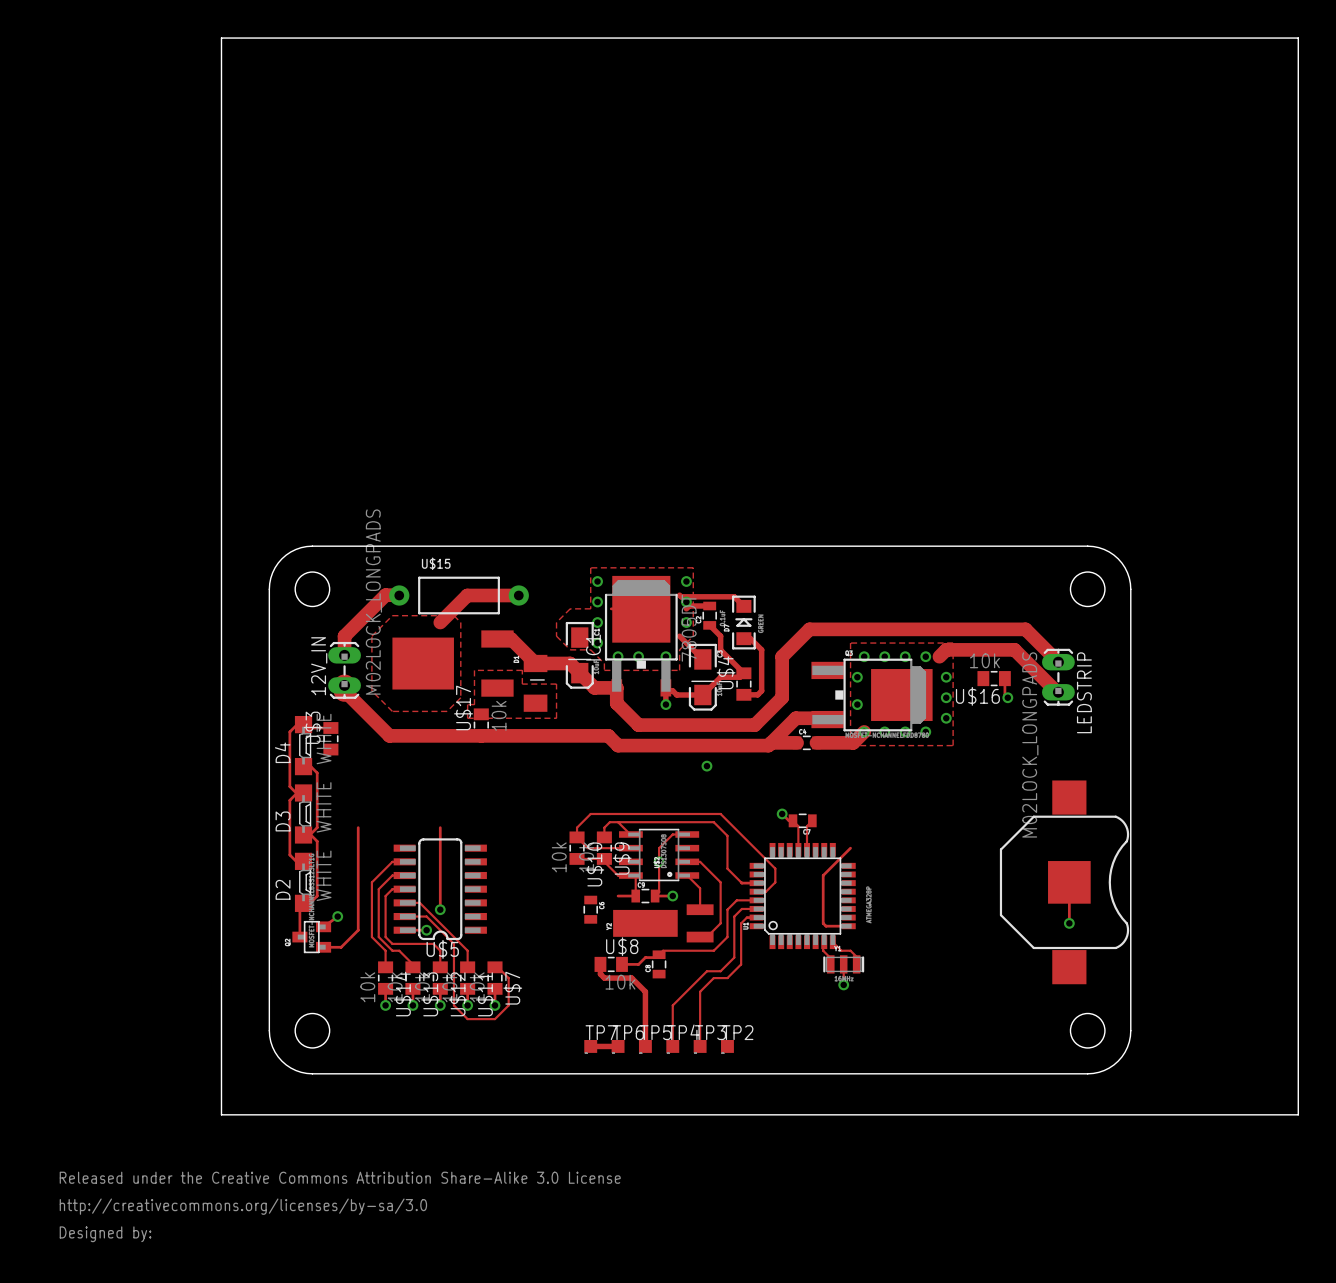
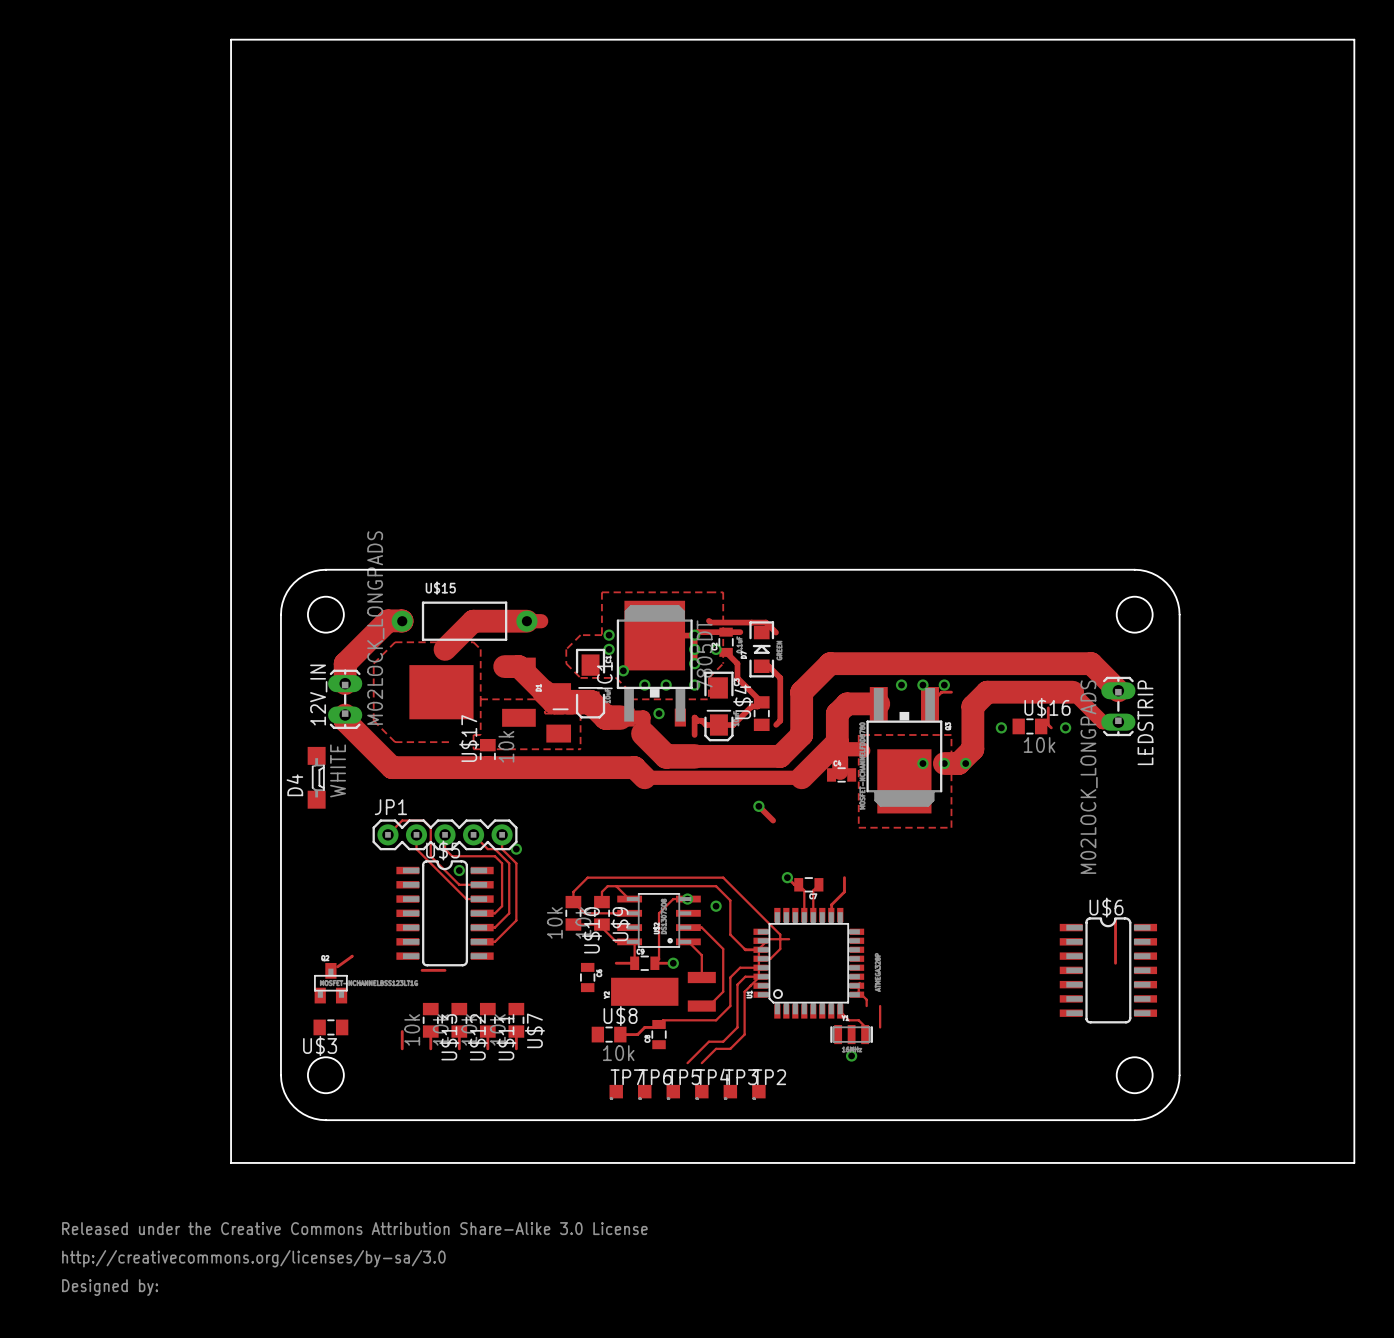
zone outline: (590, 567) (590, 608) (577, 608) -> (616, 592) (601, 592) (601, 635)
via: (597, 581) -> none
via: (686, 581) -> none
track: (399, 595) (385, 595) (344, 636) (344, 655) -> (402, 621) (387, 620) (345, 663) (345, 683)
U$15 position: (459, 595) -> (464, 621)
track: (467, 595) (440, 622) -> (487, 621) (473, 621) (445, 649)
track width: thin (467, 595) (505, 595) -> thick (487, 621) (526, 621)
via: (597, 602) -> none
via: (686, 602) -> none
track: (689, 605) (686, 608) -> (719, 632) (697, 632) (694, 635)
zone outline: (570, 608) (556, 622) (556, 636) (570, 649) -> (594, 635) (580, 635) (566, 649) (566, 663) (580, 677) (594, 677)
via: none -> (609, 635)
via: none -> (694, 635)
zone outline: (392, 615) (371, 636) (371, 690) (392, 711) -> (409, 642) (395, 642) (373, 663) (373, 720) (395, 742) (409, 742)
part position: (709, 615) -> (726, 642)
via: none -> (609, 649)
via: (597, 622) -> none
via: none -> (694, 649)
part position: (743, 622) -> (761, 649)
track: (709, 625) (720, 636) (720, 650) (743, 673) (739, 677) (726, 677) -> (726, 652) (737, 663) (737, 678) (761, 702) (757, 706)
IC1 position: (641, 636) -> (654, 663)
via: none -> (694, 663)
track: (679, 636) (702, 659) -> none
track: (743, 638) (750, 638) (761, 649) (761, 690) (757, 694) (743, 694) -> (761, 666) (768, 666) (780, 677) (780, 720) (776, 724)
track: (497, 639) (511, 639) (535, 663) (570, 663) (594, 687) -> (504, 666) (518, 666) (554, 702) (590, 702) (605, 717) (620, 717)
zone outline: (850, 643) (953, 643) (953, 745) (850, 745) (850, 643) -> none
part position: (579, 655) -> (590, 683)
via: (925, 656) -> none
track: (939, 656) (946, 649) (1014, 649) (1028, 663) -> (944, 763) (958, 763) (972, 749) (972, 706) (987, 692) (1072, 692)
U$16 value position: 10k (984, 660) -> 10k (1039, 744)
track: (1058, 662) (1025, 629) (809, 629) (782, 656) (782, 697) (754, 725) (747, 725) -> (1118, 690) (1091, 663) (830, 663) (801, 692) (801, 734) (780, 756)
track: none -> (951, 692) (941, 692) (930, 703)
12V_IN position: (344, 670) -> (345, 699)
zone outline: none -> (480, 699) (494, 699)
zone outline: (474, 670) (474, 704) (467, 704) (467, 718) -> (480, 727) (480, 734) (473, 734) (473, 749) (487, 749)
track: none -> (878, 703) (847, 703) (837, 713) (837, 742) (830, 749) (840, 759) (840, 771)
part position: (702, 677) -> (718, 706)
via: (857, 677) -> none
via: (946, 677) -> none
LEDSTRIP position: (1058, 677) -> (1118, 706)
U$16 position: (994, 678) -> (1029, 726)
via: none -> (659, 713)
U$4 position: (743, 684) -> (761, 713)
track: (344, 685) (344, 690) (389, 735) -> (345, 715) (345, 720) (392, 767) (406, 767)
part rotation: 0° (872, 695) -> 90° clockwise (904, 750)
U$16 name position: U$16 (977, 696) -> U$16 (1047, 707)
zone outline: (460, 697) (447, 711) (433, 711) -> none
via: (946, 697) -> none
via: none -> (1001, 727)
via position: (1007, 697) -> (1065, 727)
track width: thin (616, 703) (638, 725) (747, 725) -> thick (643, 733) (666, 756) (780, 756)
via: (665, 704) -> none
zone outline: none -> (858, 734) (858, 827) (951, 827) (951, 734) (858, 734)
via: (857, 704) -> none
track width: thin (795, 718) (768, 745) -> thick (830, 749) (801, 777)
via: (946, 718) -> none
U$17 position: (481, 725) -> (487, 756)
U$3 name position: U$3 (313, 727) -> U$3 (320, 1045)
track: (330, 728) (306, 728) (303, 724) (297, 724) (289, 731) (289, 786) (303, 800) (303, 792) -> none
track: (864, 731) (853, 742) (816, 742) -> none
via: (864, 731) -> none
track width: thin (389, 735) (608, 735) (618, 745) -> thick (406, 767) (634, 767) (644, 777)
U$3 rotation: 0° (330, 738) -> 90° clockwise (330, 1027)
U$3 position: (330, 738) -> (330, 1027)
track: (771, 742) (797, 742) -> none
track: (303, 766) (310, 766) (317, 772) (317, 827) (303, 841) (303, 834) -> none
via position: (706, 766) -> (758, 806)
track: none -> (758, 806) (773, 820)
track: (296, 793) (289, 800) (289, 855) (296, 861) (303, 861) -> none
track: none -> (387, 834) (402, 820) (423, 820) (430, 827) (430, 856) (459, 884) (487, 884)
track: none -> (416, 834) (416, 849) (466, 899) (482, 899)
track: none -> (445, 834) (445, 849) (452, 856) (494, 856) (502, 863) (502, 906) (494, 913) (482, 913)
JP1: none -> (445, 834)
track: none -> (473, 834) (487, 849) (494, 849) (509, 863) (509, 913) (494, 927) (482, 927)
track: none -> (502, 834) (502, 849) (516, 863) (516, 920) (494, 941) (482, 941)
D3: WHITE (303, 813) -> none
via: none -> (516, 849)
track: (782, 813) (798, 826) (798, 849) -> (787, 877) (804, 890) (804, 915)
via: (782, 813) -> none
part position: (802, 820) -> (808, 884)
track: (812, 820) (806, 826) (806, 849) -> (818, 884) (813, 890) (813, 915)
track: (618, 822) (630, 834) -> (616, 886) (629, 899)
track: (358, 827) (358, 930) (341, 947) (323, 947) -> none
track: (440, 827) (440, 909) -> none
track: (310, 834) (317, 841) (317, 896) (303, 909) (299, 909) -> none
via: none -> (459, 870)
track: (687, 834) (672, 834) (659, 848) (659, 892) (655, 896) -> (688, 899) (673, 899) (659, 913) (659, 959) (654, 963)
track: (604, 837) (604, 827) (609, 822) (713, 822) (727, 835) (727, 868) (741, 883) (756, 883) -> none
via: none -> (787, 877)
track: none -> (844, 877) (844, 891) (831, 904) (831, 915)
U$10 position: (577, 848) -> (573, 913)
U$9 position: (604, 848) -> (601, 913)
track: (630, 848) (587, 848) (577, 837) (577, 827) (590, 813) (720, 813) (775, 868) (775, 882) (765, 891) (756, 891) -> (629, 913) (584, 913) (573, 902) (573, 891) (587, 877) (723, 877) (780, 934) (780, 948) (770, 958) (760, 958)
track: (850, 848) (823, 875) (823, 923) (826, 926) (848, 926) -> none
part position: (659, 855) -> (659, 920)
track: (577, 858) (604, 858) (604, 861) (618, 875) (635, 875) (635, 896) (618, 896) -> (573, 924) (601, 924) (601, 927) (616, 941) (634, 941) (634, 963) (616, 963)
track: (404, 861) (392, 861) (371, 882) (371, 937) (385, 950) (385, 967) -> none
track: (687, 861) (700, 861) (720, 882) (720, 923) (706, 937) (700, 937) -> (688, 927) (701, 927) (723, 948) (723, 991) (708, 1006) (701, 1006)
via: none -> (716, 906)
track: (404, 875) (392, 875) (378, 889) (378, 937) (392, 950) (399, 950) (412, 964) (412, 967) -> none
track: (687, 875) (700, 888) -> (601, 902) (601, 891) (607, 886) (716, 886) (730, 900) (730, 926)
D2: WHITE (303, 882) -> none
part: (1064, 882) -> none
track: (404, 889) (392, 889) (385, 896) (385, 937) (392, 943) (433, 943) (440, 950) (440, 967) -> none
U$5 rotation: 0° (440, 889) -> 180° (445, 913)
part position: (645, 896) -> (644, 963)
track: (659, 896) (672, 896) -> (659, 963) (673, 963)
via: (672, 896) -> none
track: (700, 896) (700, 909) -> (730, 934) (745, 949) (760, 949)
part position: (802, 896) -> (808, 963)
track: (404, 902) (419, 902) (467, 950) (467, 967) -> none
track: none -> (688, 941) (701, 955) (701, 977)
track: (303, 903) (299, 906) (299, 937) -> none
track: (756, 908) (741, 908) (734, 916) (734, 957) (720, 971) (706, 971) (679, 998) -> none
via: (440, 909) -> none
part position: (590, 909) -> (587, 977)
via: (337, 916) -> none
track: (399, 916) (426, 916) (453, 943) (453, 1005) (467, 1019) (494, 1019) (508, 1005) (508, 978) (497, 967) (494, 967) (494, 964) -> none
track: (756, 917) (746, 917) (741, 923) (741, 964) (727, 978) (713, 978) (706, 984) -> (760, 976) (745, 976) (737, 984) (737, 1027)
via: none -> (673, 963)
part position: (663, 923) -> (663, 991)
via: (1069, 923) -> none
track: none -> (760, 967) (740, 967) (730, 977) (730, 1006) (716, 1020) (663, 1020) (656, 1027) (644, 1027) (637, 1034) (620, 1034)
via: (426, 930) -> none
U$6: none -> (1108, 970)
part rotation: 0° (311, 937) -> 90° clockwise (330, 983)
track: (832, 942) (841, 950) (850, 950) (856, 956) (856, 964) -> (840, 1011) (849, 1020) (858, 1020) (865, 1026) (865, 1034)
track: (713, 950) (663, 950) (656, 957) (645, 957) (638, 964) (622, 964) -> (744, 991) (744, 1034) (730, 1048) (716, 1048) (701, 1063)
track: (600, 964) (600, 974) (604, 978) (631, 978) (645, 991) (645, 1046) -> none
U$8 position: (611, 964) -> (609, 1034)
part position: (659, 964) -> (659, 1034)
part position: (843, 964) -> (851, 1034)
U$14: 10k (385, 978) -> none
via position: (843, 984) -> (851, 1055)
track: (700, 991) (700, 1046) -> (730, 1034) (723, 1041) (708, 1041)
via: (385, 1005) -> none
via: (412, 1005) -> none
via: (440, 1005) -> none
via: (467, 1005) -> none
via: (494, 1005) -> none
track: (672, 1005) (672, 1046) -> (701, 1048) (687, 1063)
track: (590, 1046) (618, 1046) -> none

